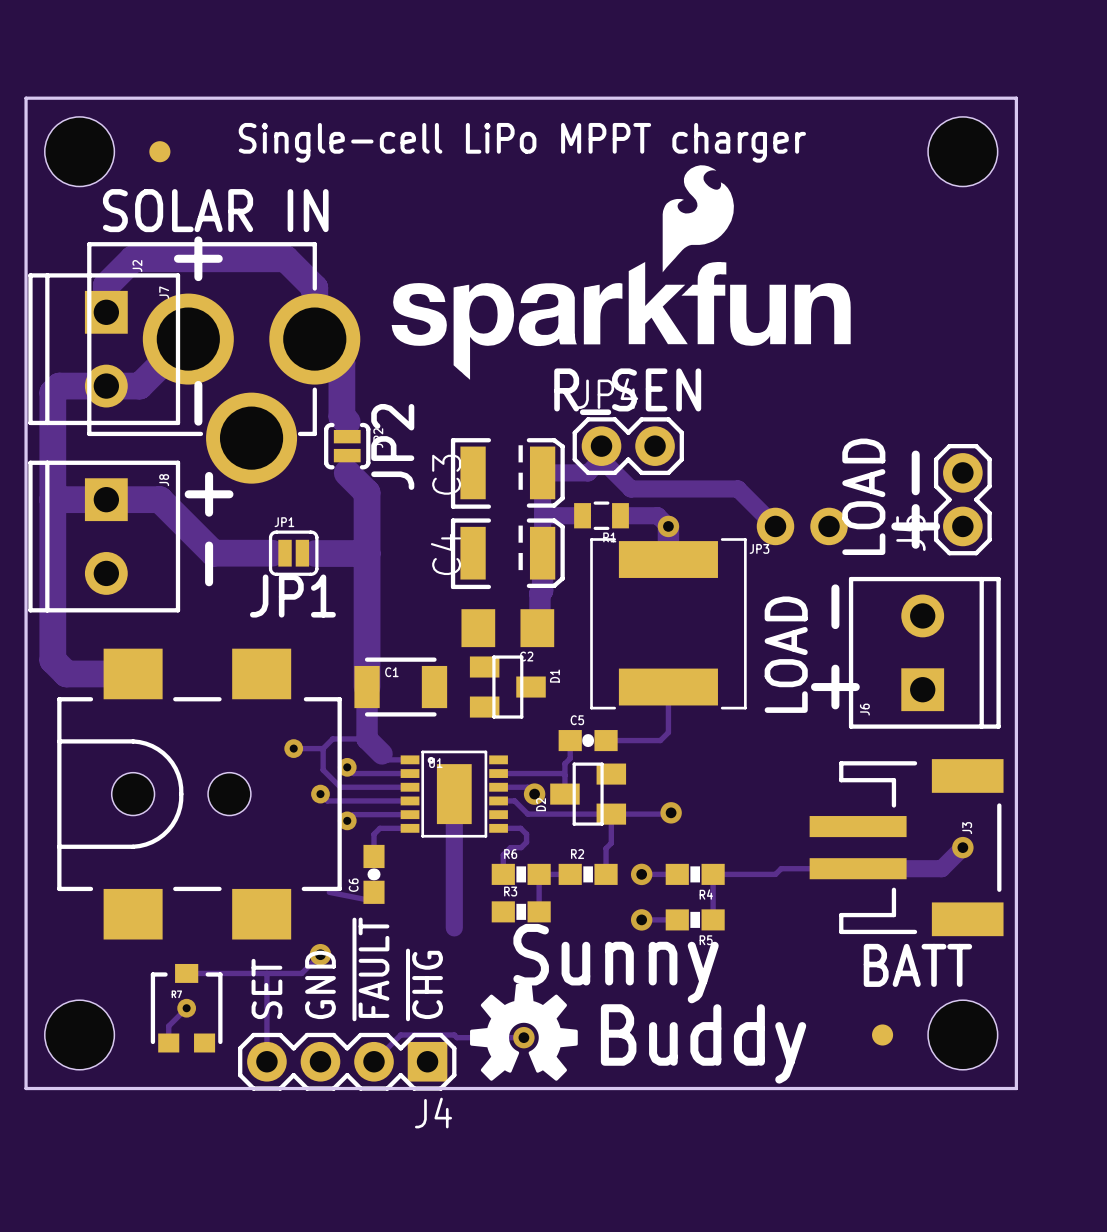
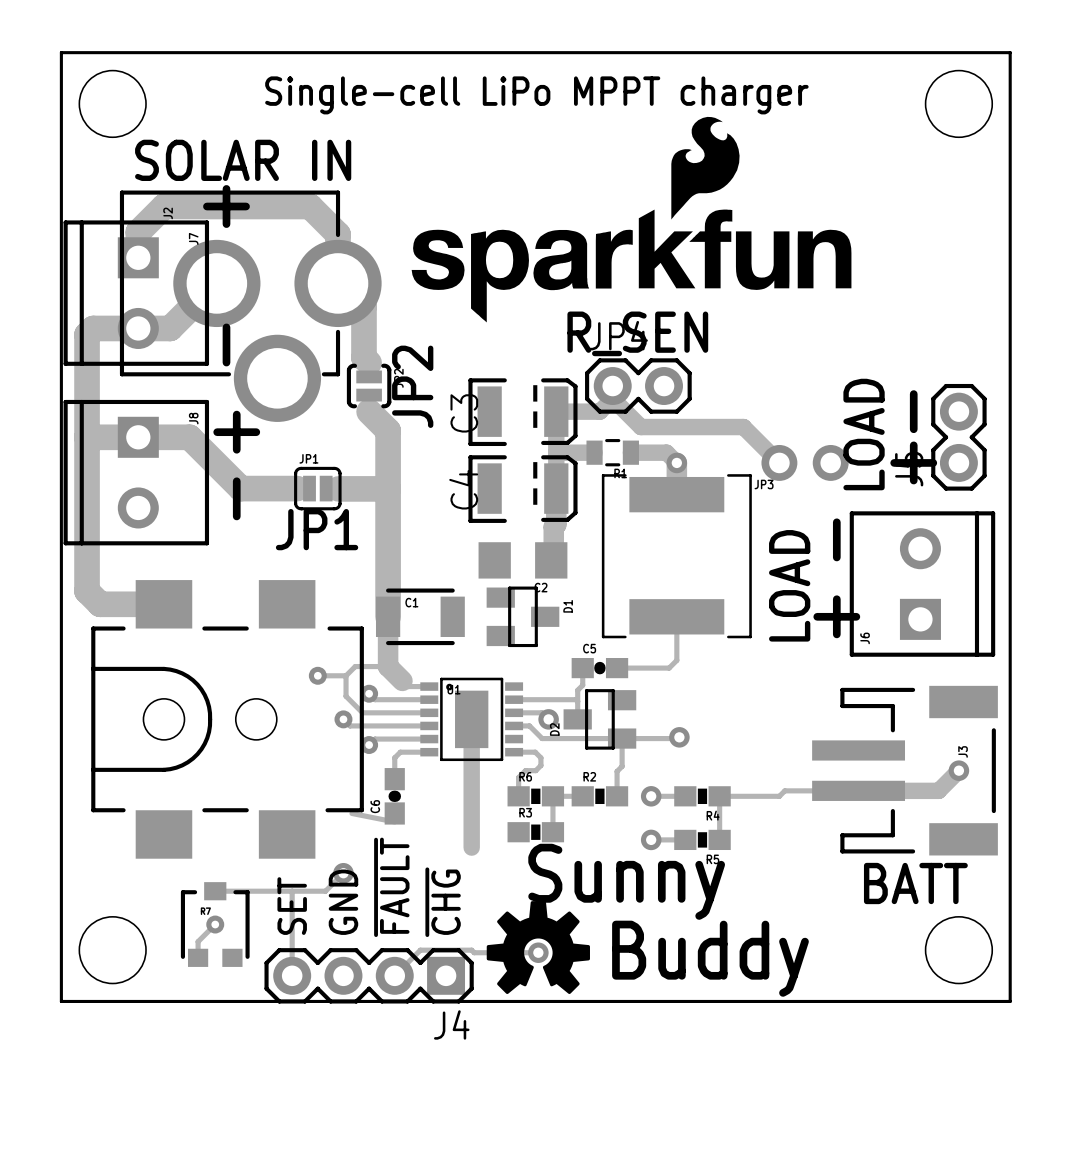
part: (159, 151) -> none
part: (882, 1034) -> none

